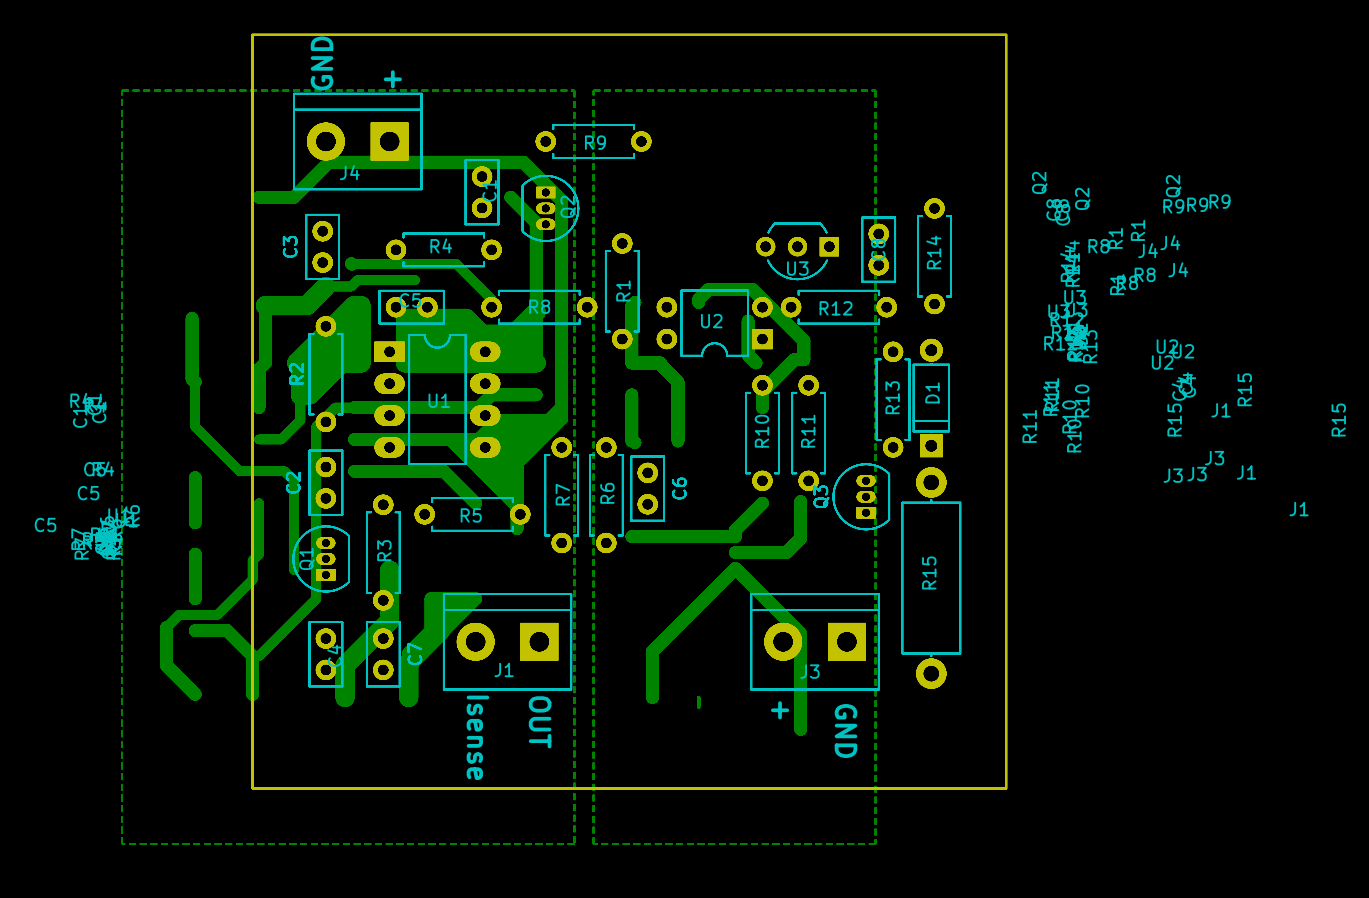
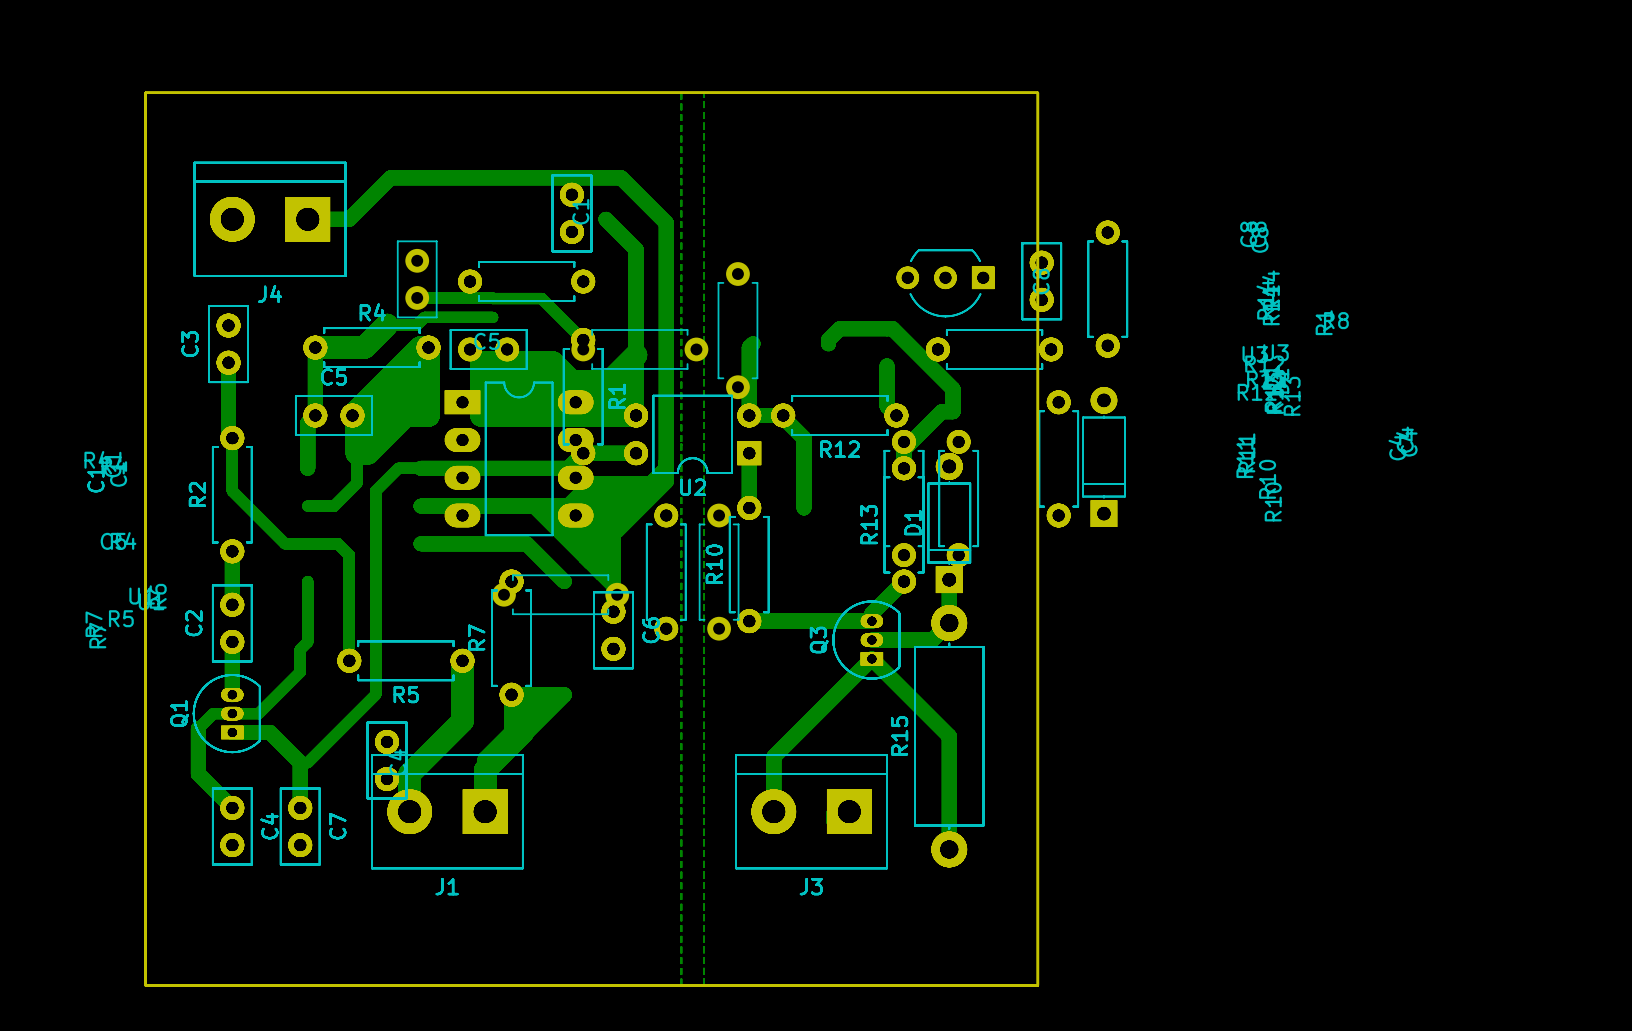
board edge: (252, 34) (1006, 34) (1006, 788) (252, 788) (252, 34) -> (145, 92) (1037, 92) (1037, 985) (145, 985) (145, 92)
text: GND (322, 63) -> none
text: + (392, 79) -> none
J4: (357, 141) -> none
J4: (357, 141) -> none
J4: (357, 141) -> none
J4: (357, 141) -> none
R9: (593, 141) -> none
R9: (593, 141) -> none
R9: (593, 141) -> none
R9: (593, 141) -> none
J4: none -> (270, 219)
Q2: (550, 208) -> none
Q2: (550, 208) -> none
Q2: (550, 208) -> none
Q2: (550, 208) -> none
R4 name position: R4 (441, 245) -> R4 (372, 312)
C3 position: (322, 246) -> (228, 344)
C1: none -> (417, 279)
R4 position: (443, 249) -> (371, 347)
U3: (797, 251) -> none
U3: (797, 251) -> none
R14: (934, 256) -> none
R1: (622, 291) -> none
R1: (622, 291) -> none
R1: (622, 291) -> none
C5: (411, 307) -> none
C5: (411, 307) -> none
R8: (539, 307) -> none
R8: (539, 307) -> none
R8: (539, 307) -> none
R12 position: (838, 307) -> (839, 415)
R12 name position: R12 (836, 308) -> R12 (840, 449)
U2: (714, 323) -> none
U2: (714, 323) -> none
U2: (714, 323) -> none
U2: (714, 323) -> none
R1: none -> (583, 396)
C5: none -> (333, 415)
R2 position: (325, 374) -> (232, 494)
U2: none -> (692, 434)
R13 name position: R13 (892, 397) -> R13 (869, 524)
D1: (931, 398) -> none
part: (931, 398) -> none
part: (437, 399) -> none
U1: (437, 399) -> none
R13 position: (893, 399) -> (903, 524)
R10: (762, 433) -> none
R10: (762, 433) -> none
R11: (808, 433) -> none
R11: (808, 433) -> none
D1: none -> (949, 523)
C2 position: (325, 482) -> (232, 623)
R10: none -> (749, 564)
C6 position: (647, 488) -> (613, 630)
part: (561, 495) -> none
R7: (561, 495) -> none
R6: (606, 495) -> none
part: (606, 495) -> none
part: (606, 495) -> none
Q3 position: (861, 496) -> (866, 640)
R5: (472, 514) -> none
part: (472, 514) -> none
part: (472, 514) -> none
R7: none -> (511, 638)
part: (383, 552) -> none
R3: (383, 552) -> none
part: (383, 552) -> none
part: (383, 552) -> none
Q1: (321, 558) -> none
part: (321, 558) -> none
part: (321, 558) -> none
part: (321, 558) -> none
R5: none -> (405, 660)
R15: (931, 578) -> none
R15: (931, 578) -> none
R15: (931, 578) -> none
R15: (931, 578) -> none
Q1: none -> (226, 713)
R15: none -> (949, 736)
J1: (507, 641) -> none
J1: (507, 641) -> none
J1: (507, 641) -> none
J1: (507, 641) -> none
J3: (815, 641) -> none
J3: (815, 641) -> none
J3: (815, 641) -> none
J3: (815, 641) -> none
C7 position: (383, 654) -> (300, 826)
J1: none -> (447, 811)
J3: none -> (811, 811)
C4: none -> (232, 826)
text: + (780, 710) -> none
text: OUT (540, 722) -> none
text: GND (845, 731) -> none
text: Isense (477, 737) -> none

